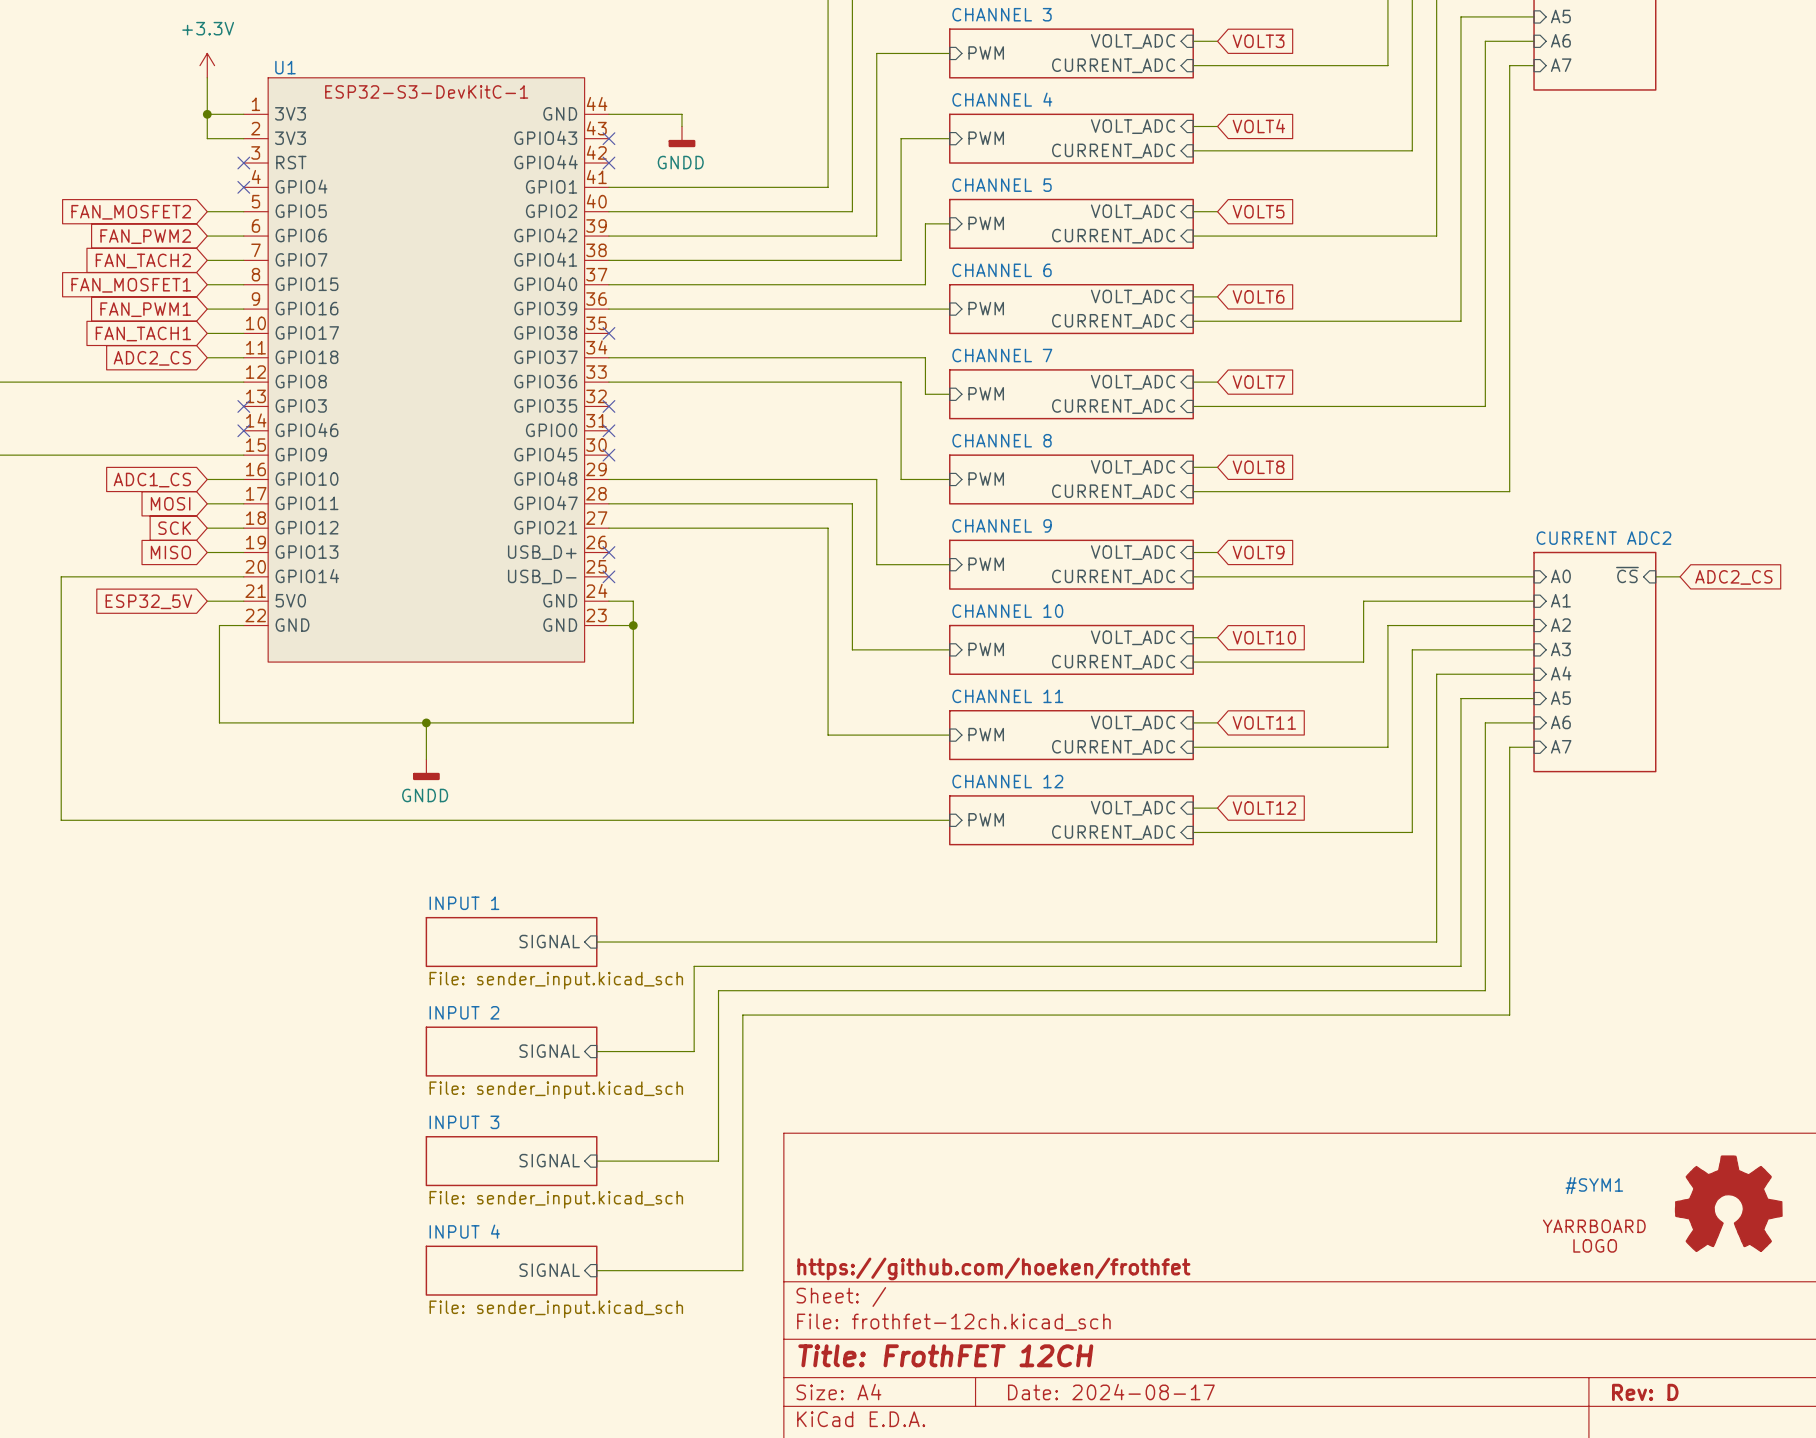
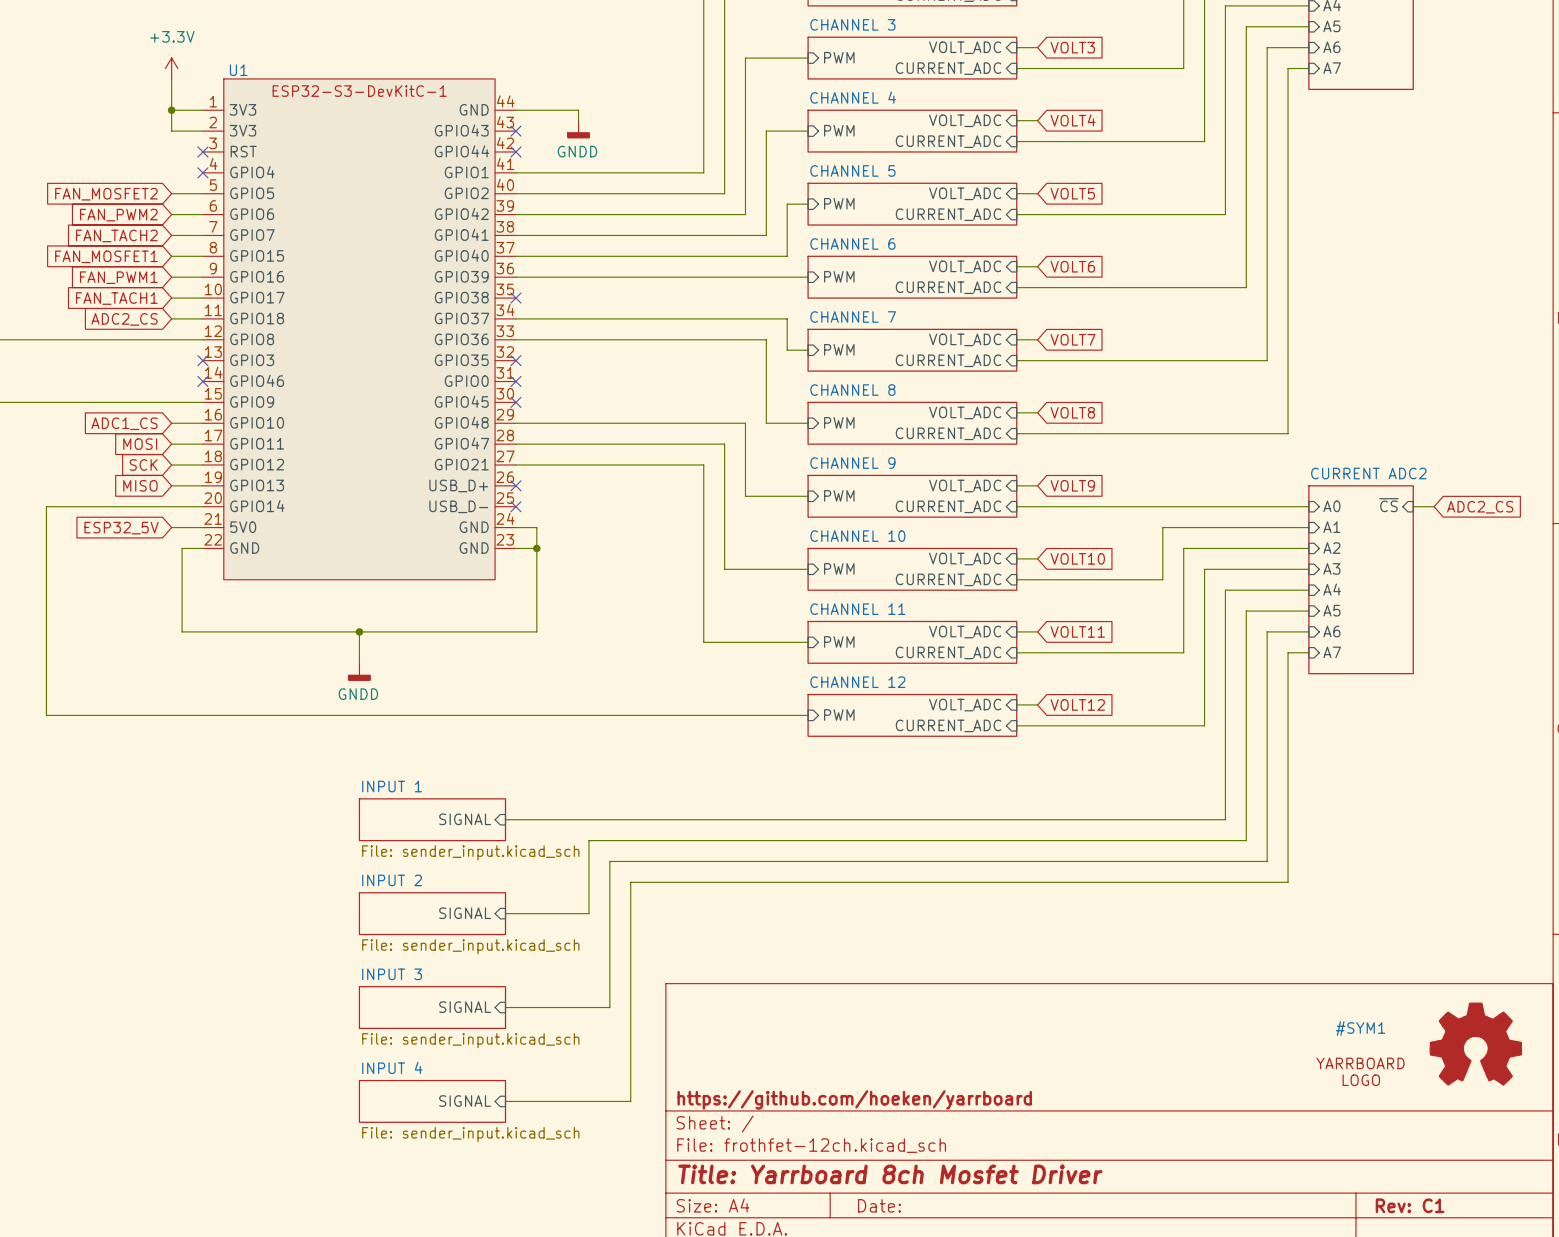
title block: https://github.com/hoeken/frothfet (993, 1268) -> https://github.com/hoeken/yarrboard (854, 1099)
title block: Title: FrothFET 12CH (945, 1355) -> Title: Yarrboard 8ch Mosfet Driver (890, 1174)
title block: Date: 2024-08-17 (1111, 1392) -> Date: (879, 1205)
title block: Rev: D (1645, 1392) -> Rev: C1 (1410, 1205)

